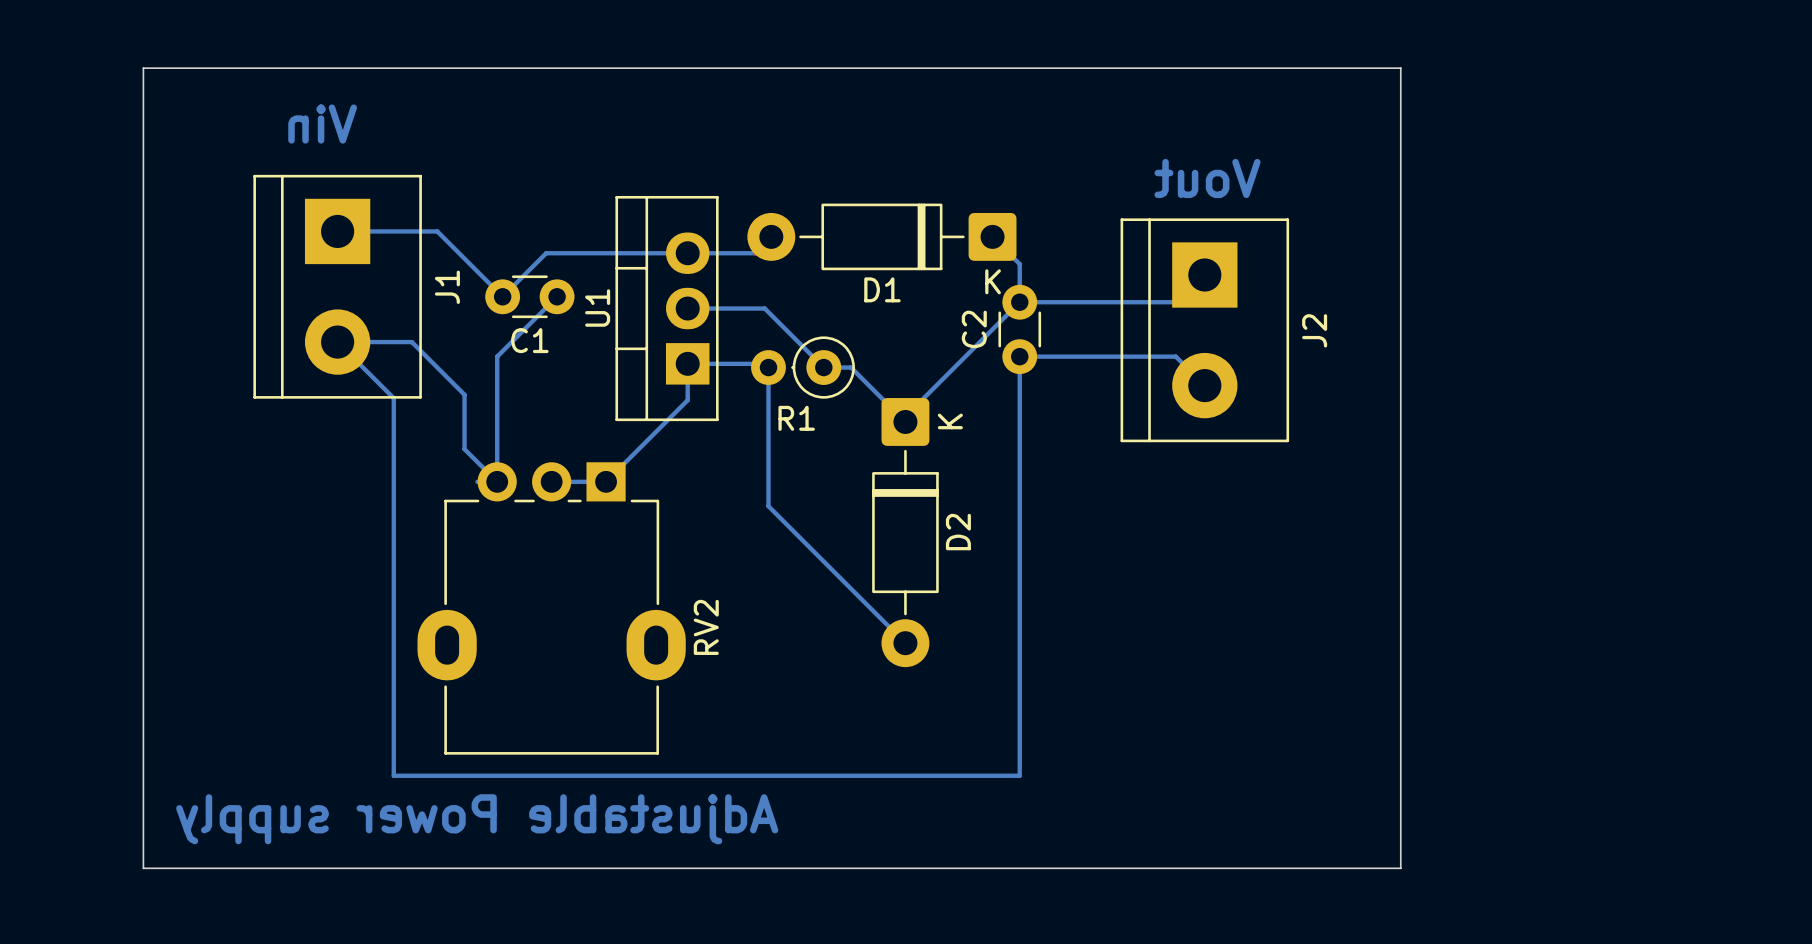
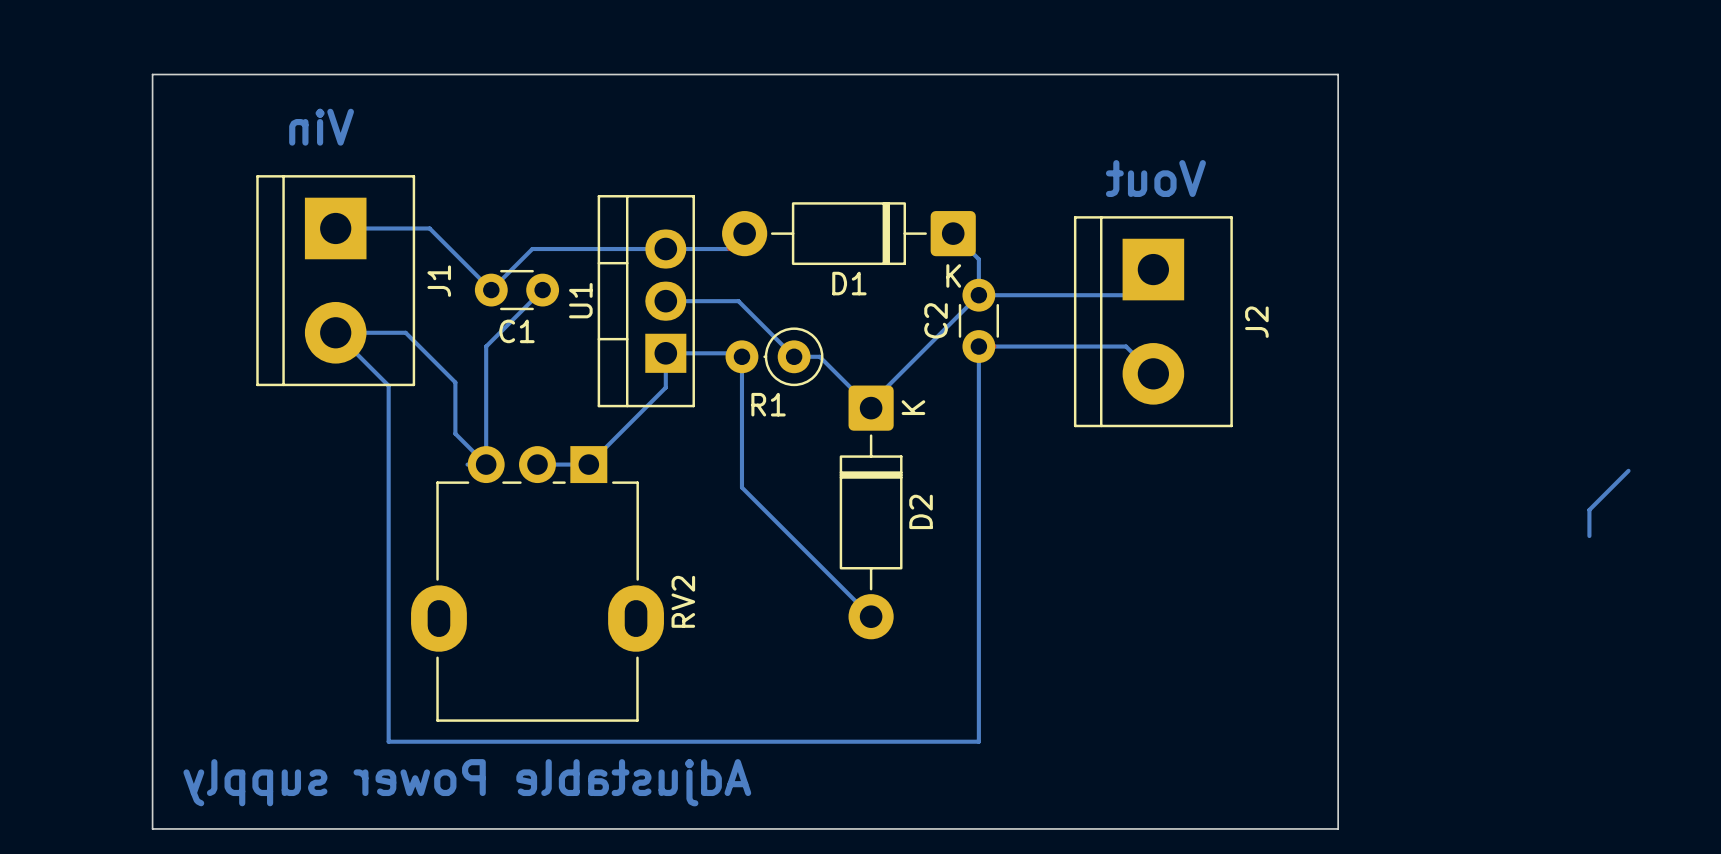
bottom track: none -> (1628, 470) (1589, 509) (1589, 536)

